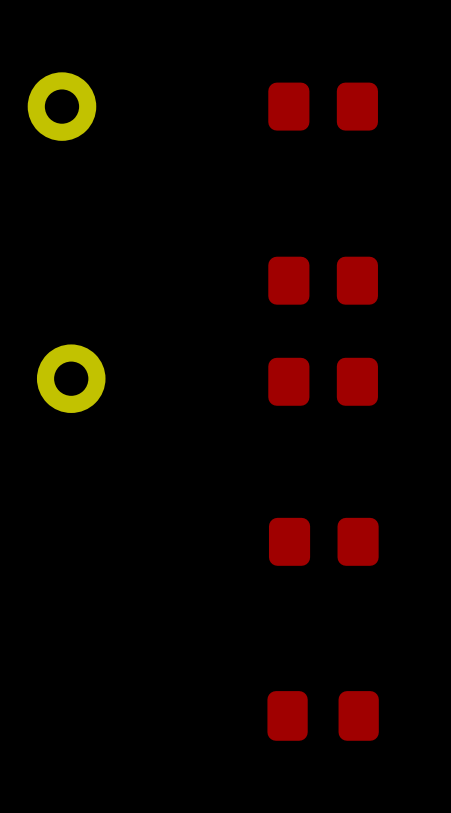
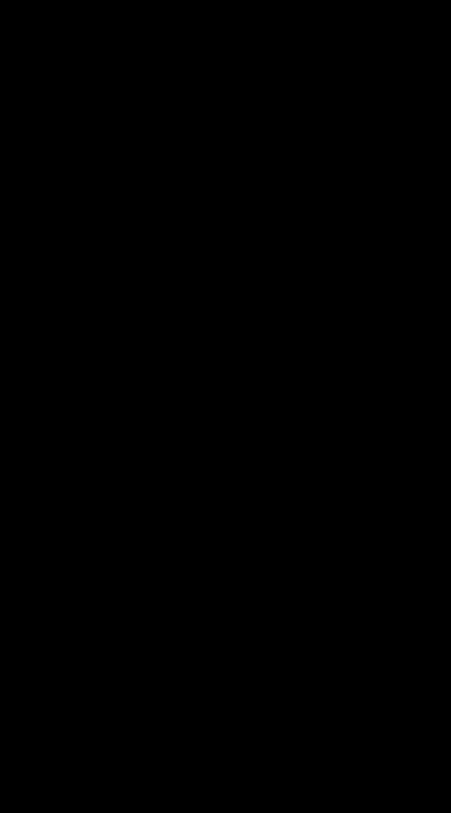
part: (61, 106) -> none
part: (323, 106) -> none
part: (323, 280) -> none
part: (71, 378) -> none
part: (323, 381) -> none
part: (323, 541) -> none
part: (323, 715) -> none

